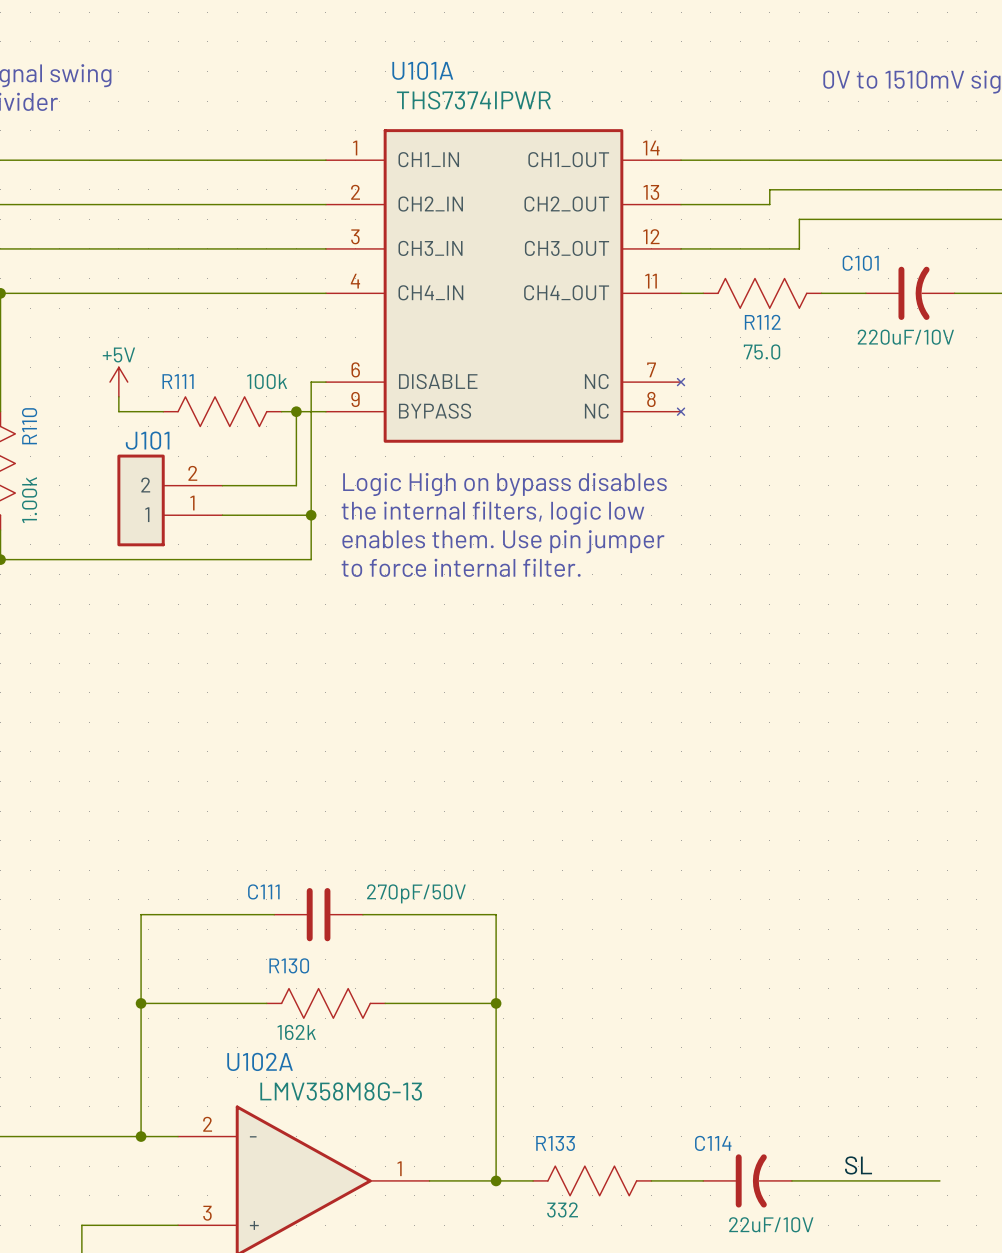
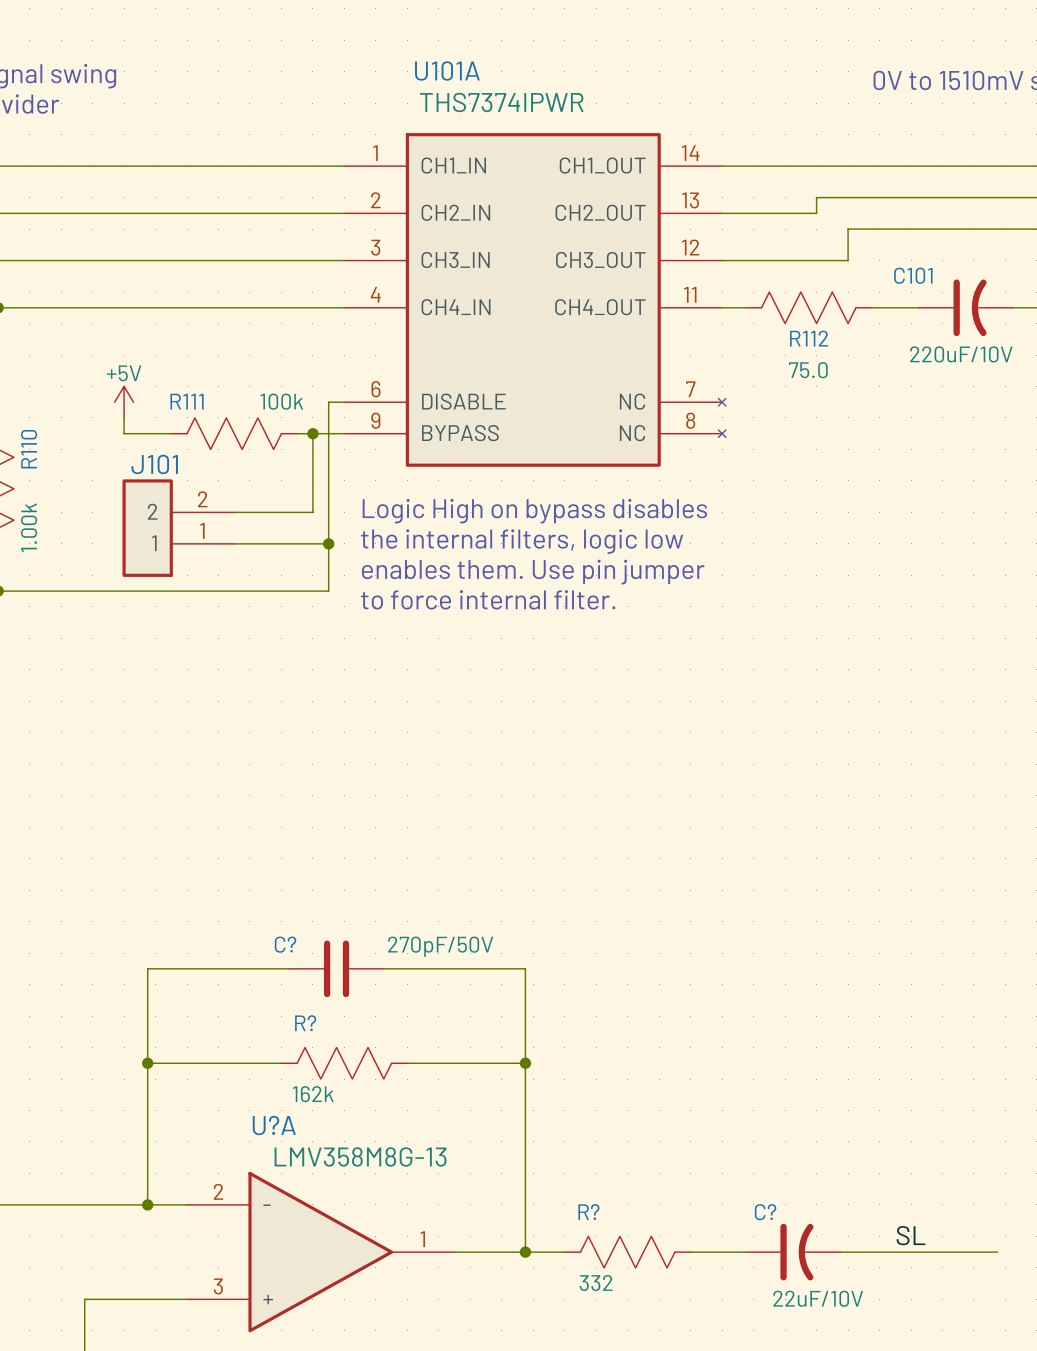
C111 name: C111 (263, 891) -> C? (285, 944)
R130 name: R130 (289, 965) -> R? (305, 1023)
U102A name: U102A (260, 1061) -> U?A (274, 1125)
R133 name: R133 (555, 1143) -> R? (588, 1212)
C114 name: C114 (713, 1143) -> C? (765, 1212)

